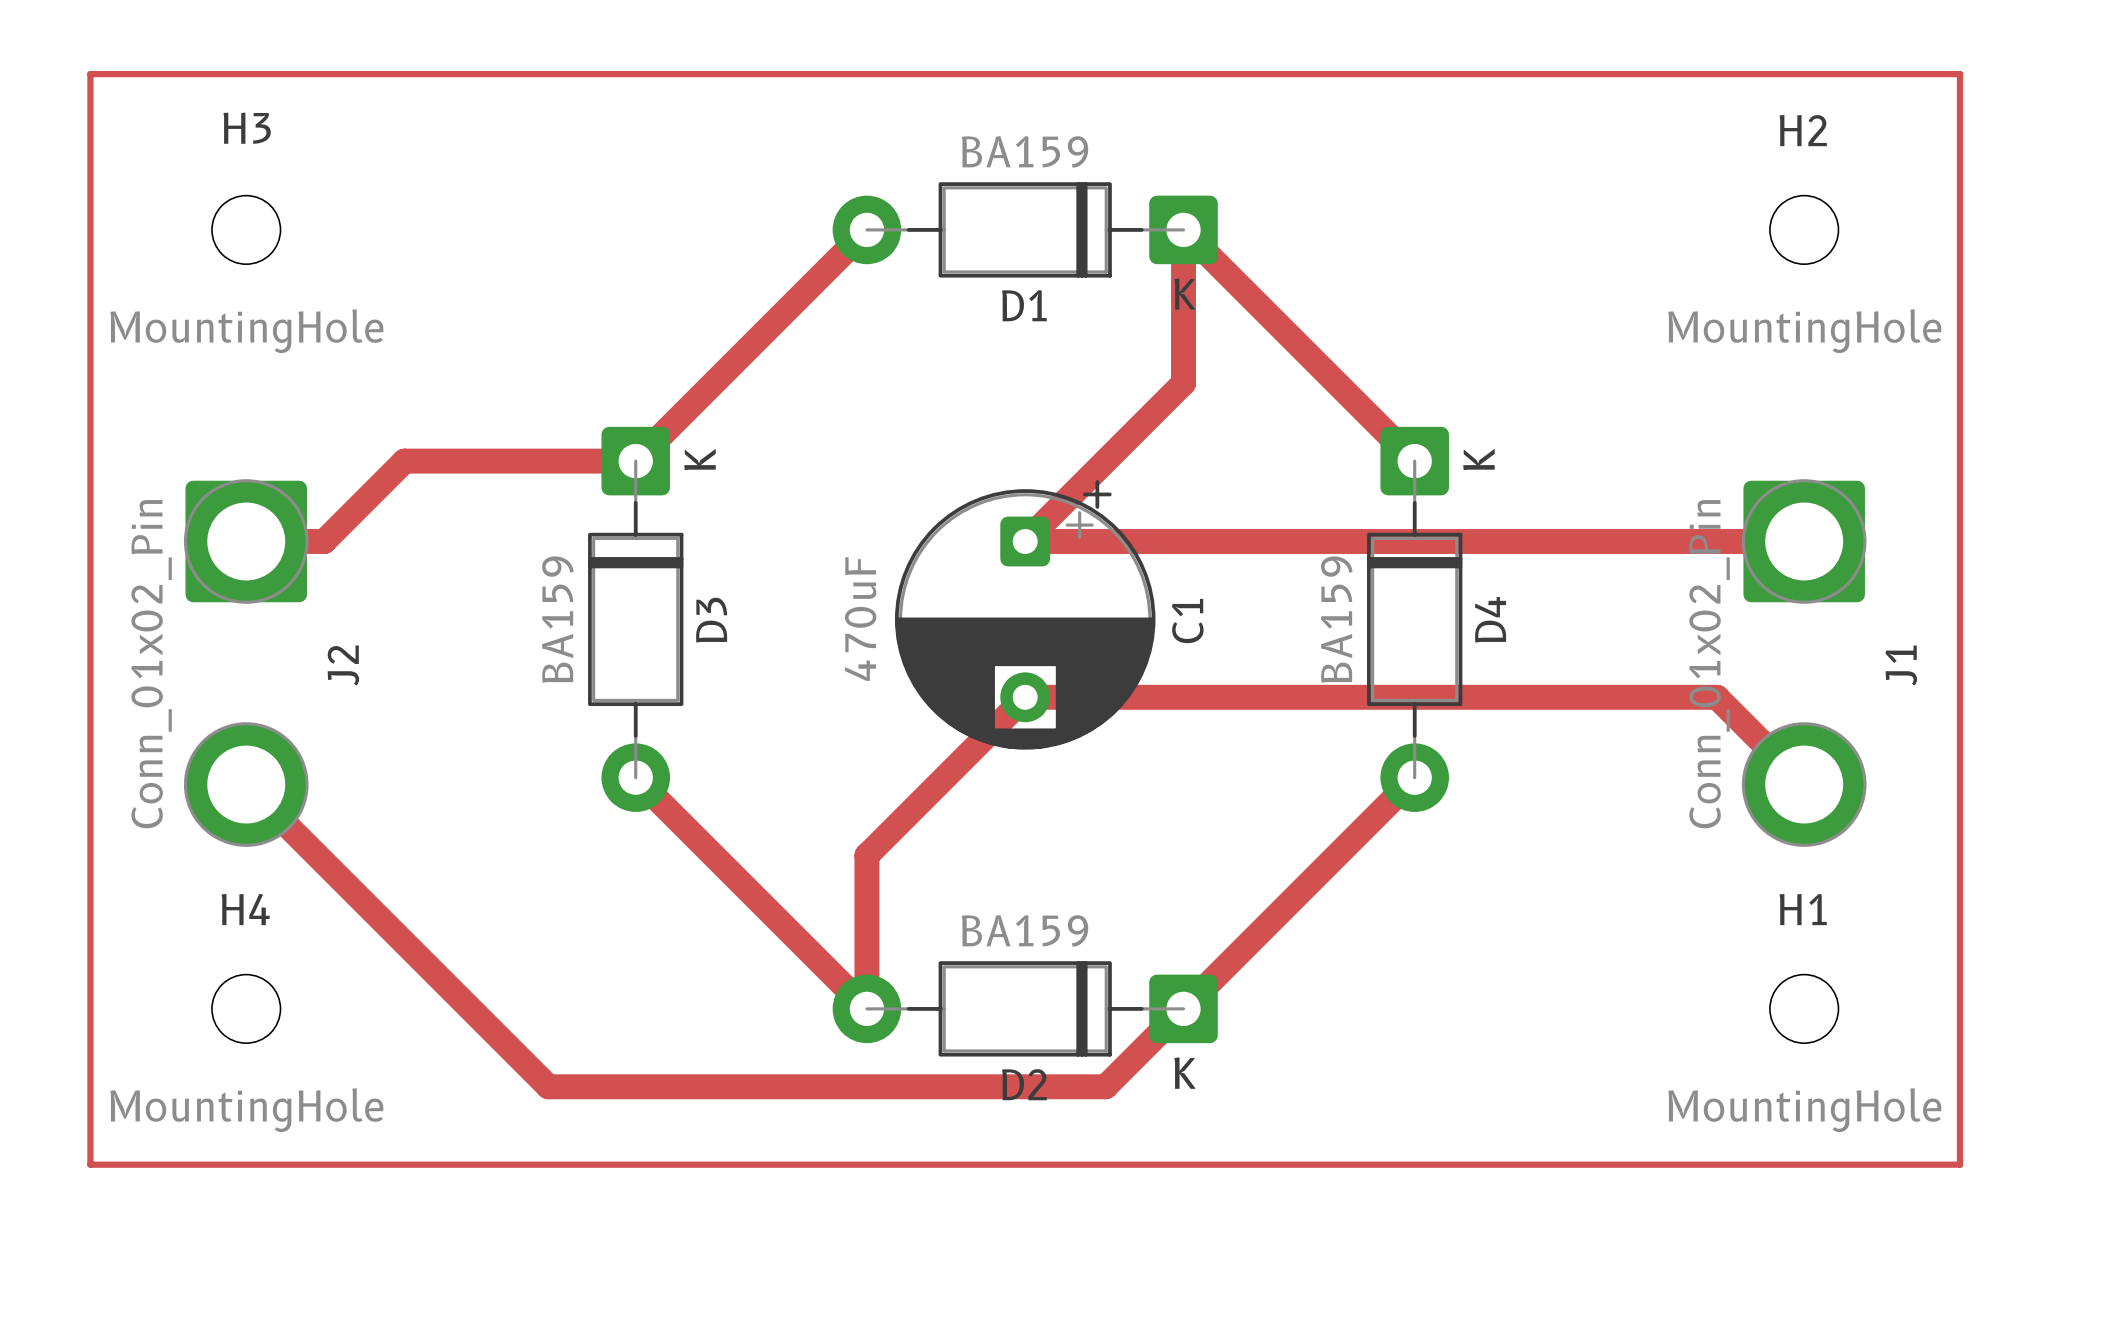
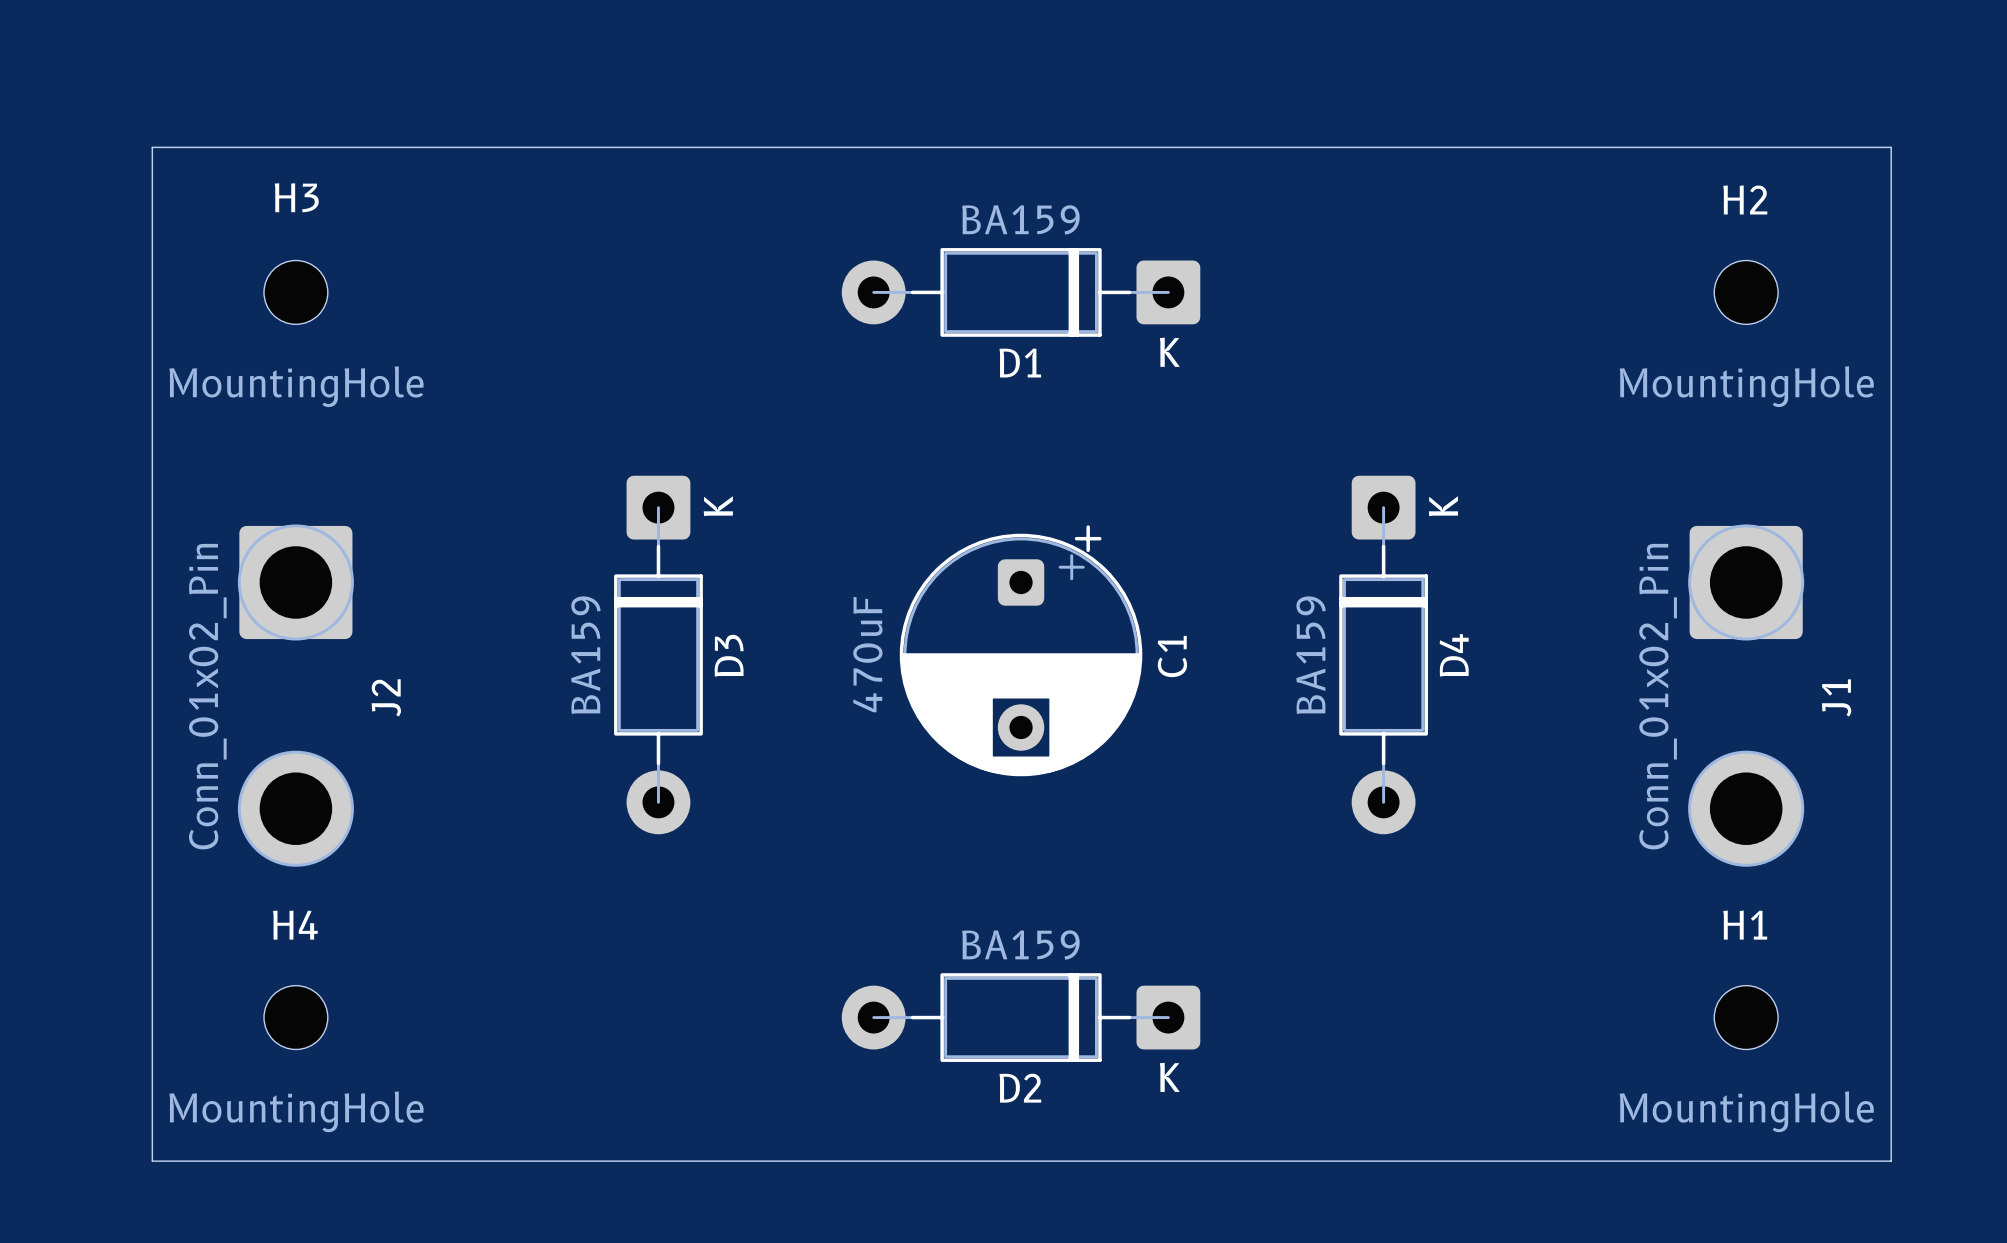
track: (90, 74) (1959, 74) (1959, 1164) (90, 1164) (90, 74) -> none
board edge: none -> (152, 147) (1891, 147) (1891, 1161) (152, 1161) (152, 147)
track: (866, 229) (635, 461) (404, 461) (324, 541) (246, 541) -> none
track: (1414, 461) (1183, 229) (1183, 383) (1025, 541) (1804, 541) -> none
track: (635, 777) (866, 1008) (866, 855) (1025, 697) (1716, 697) (1804, 784) -> none
track: (1414, 777) (1105, 1086) (548, 1086) (246, 784) -> none

